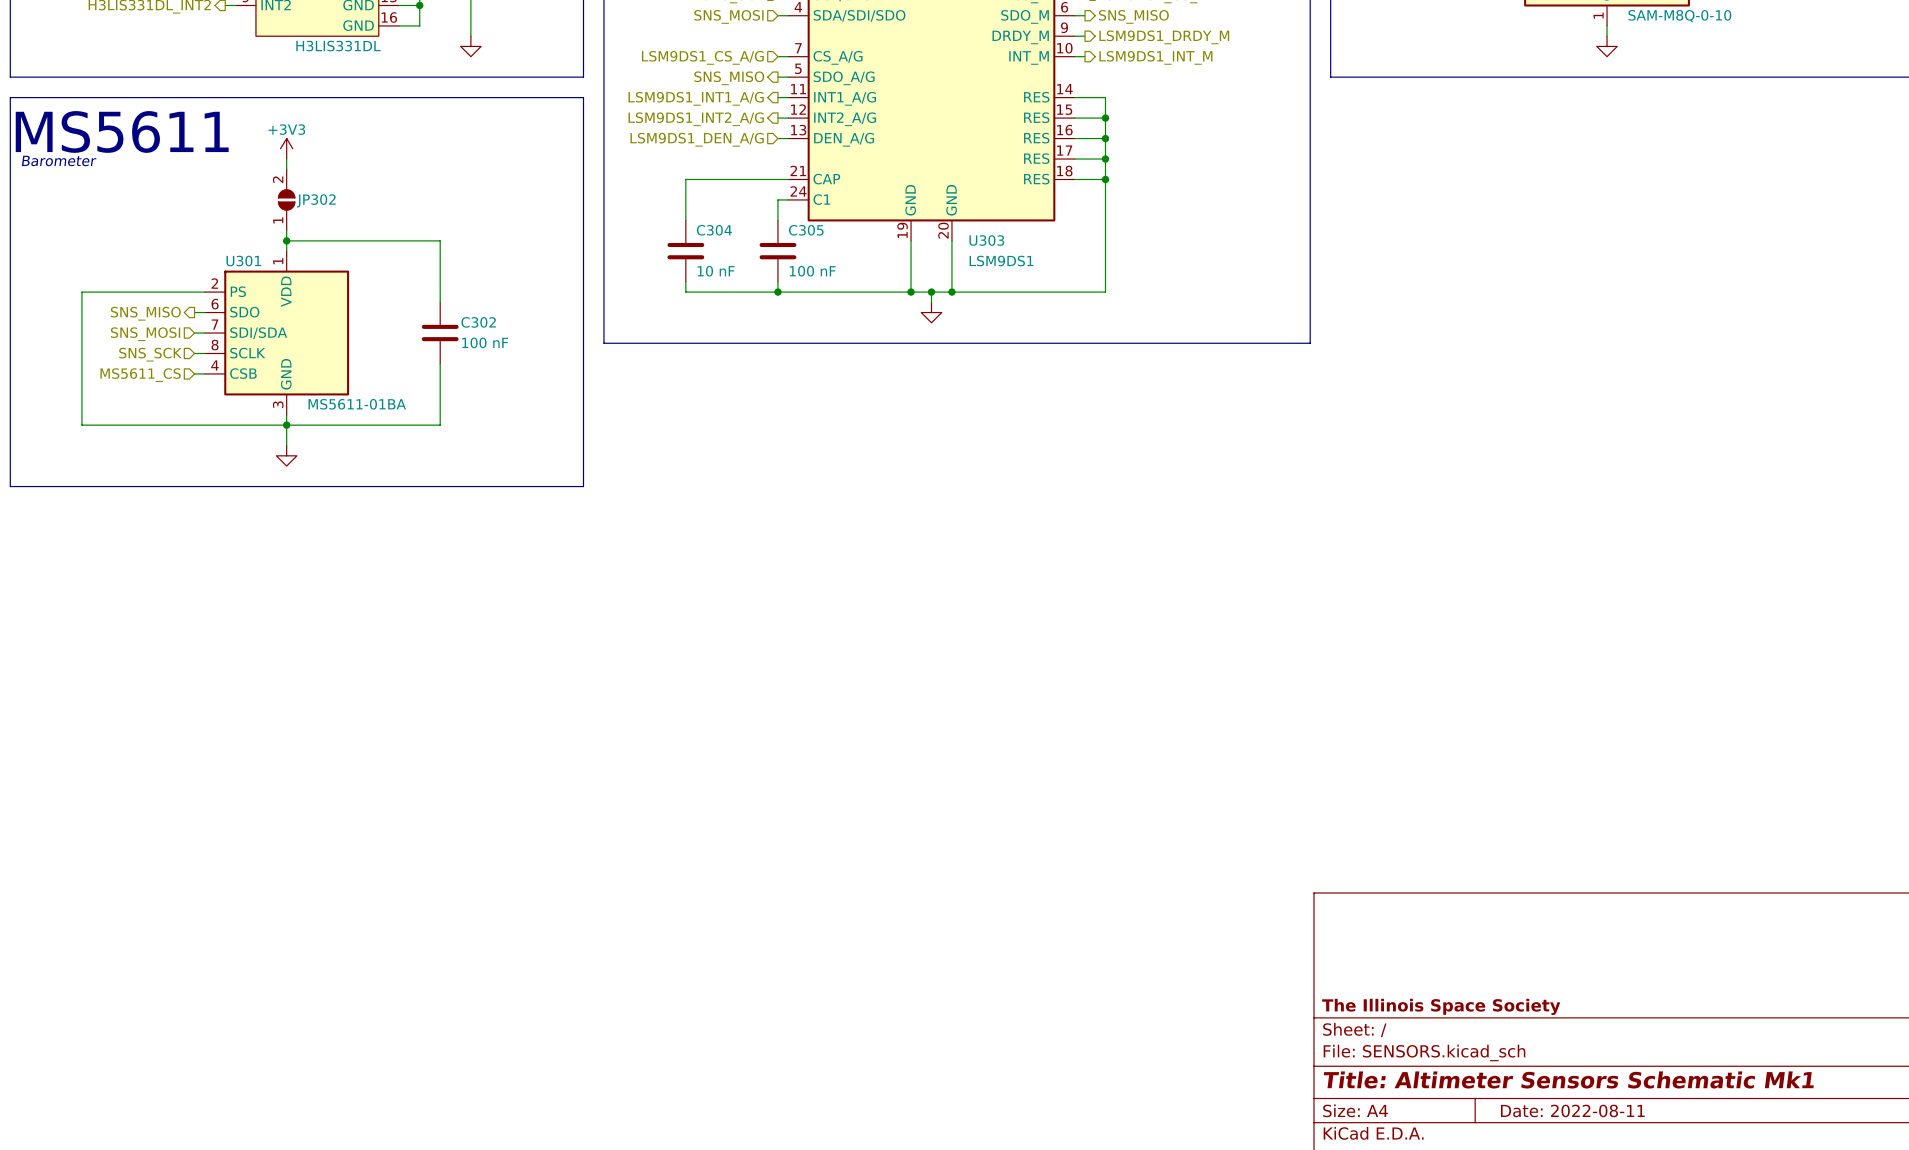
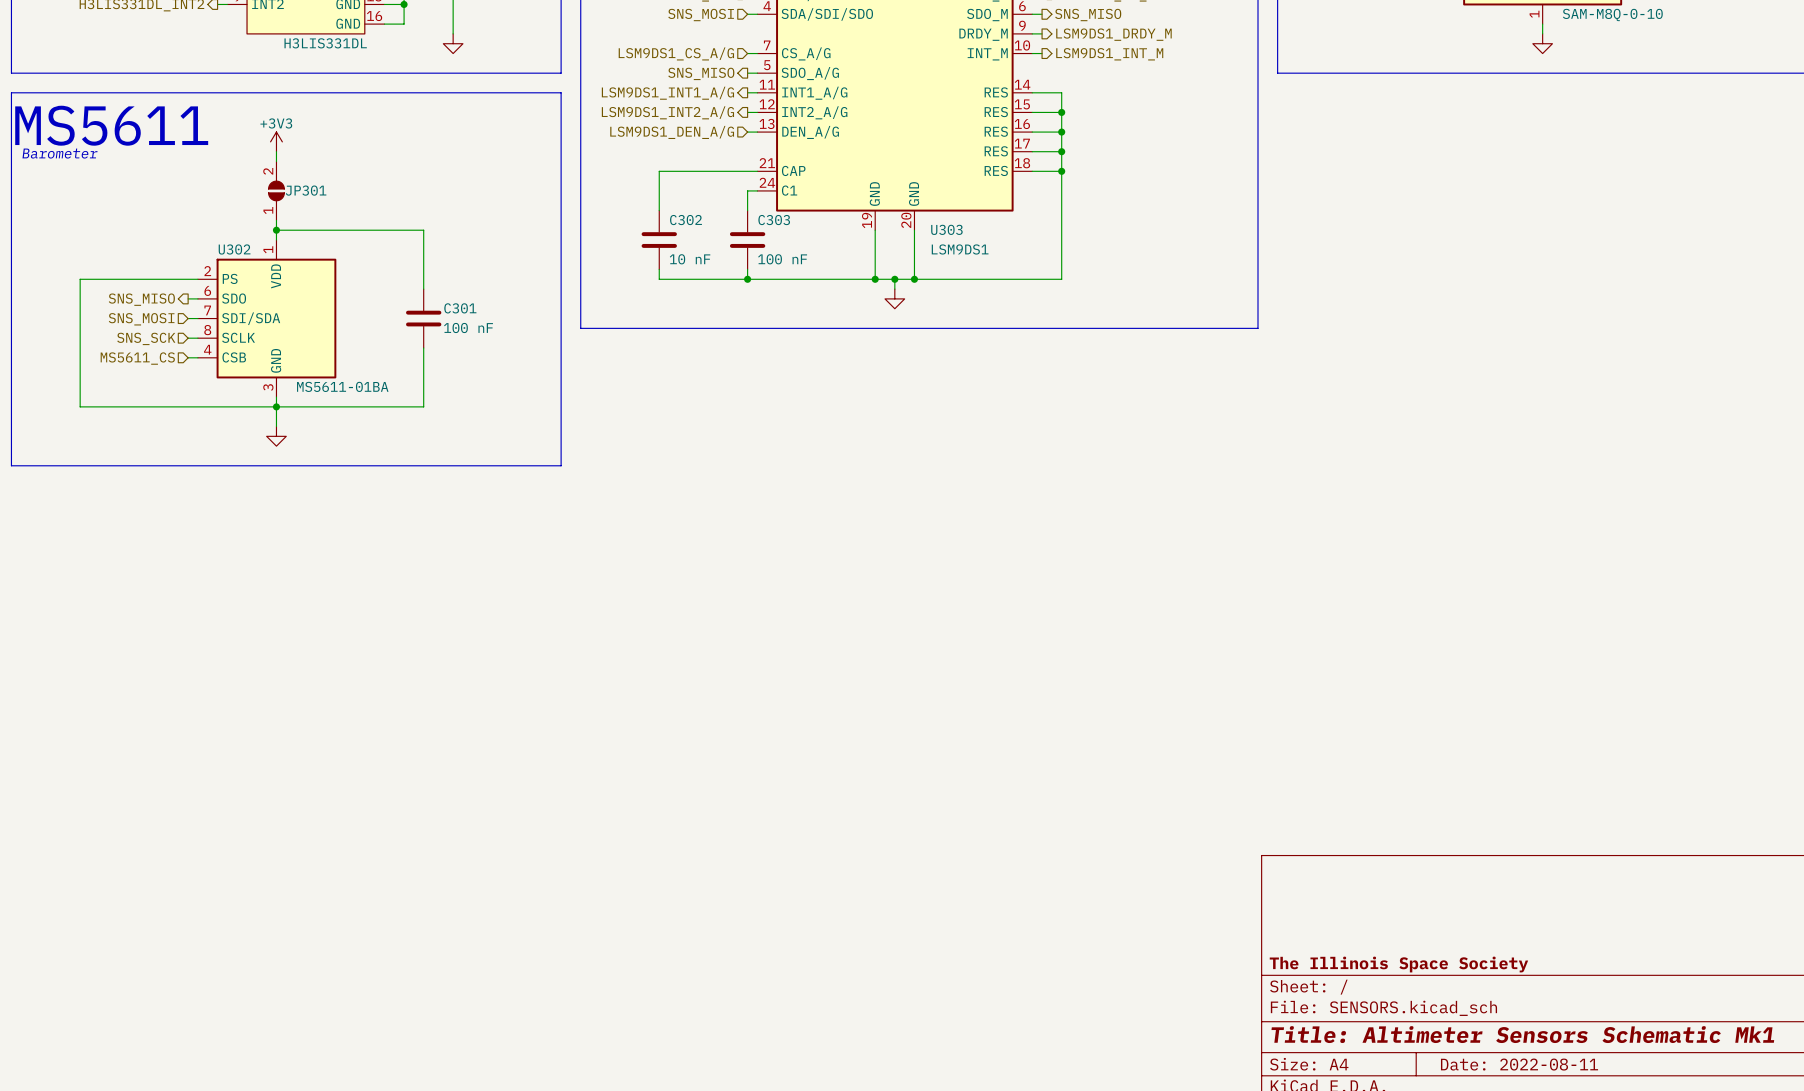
JP302 name: JP302 (316, 200) -> JP301 (306, 190)
C304 name: C304 (714, 230) -> C302 (686, 220)
C305 name: C305 (806, 230) -> C303 (774, 220)
U301 name: U301 (243, 261) -> U302 (234, 249)
C302 name: C302 (478, 322) -> C301 (460, 308)

